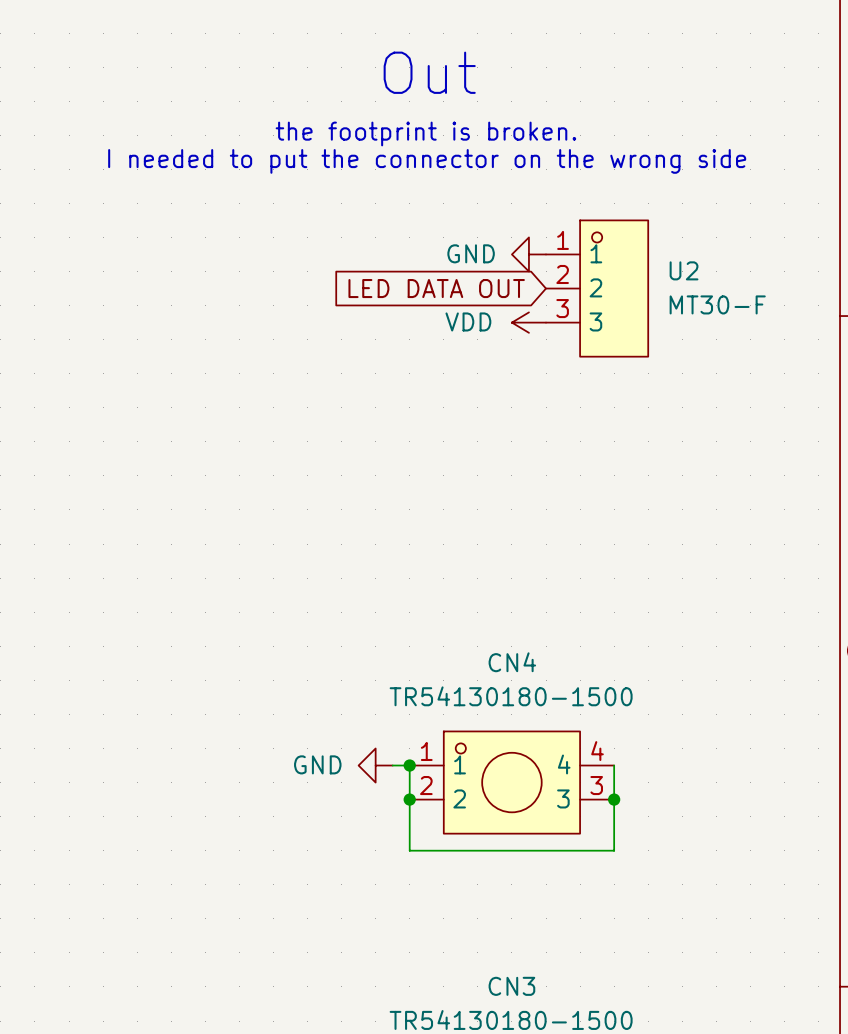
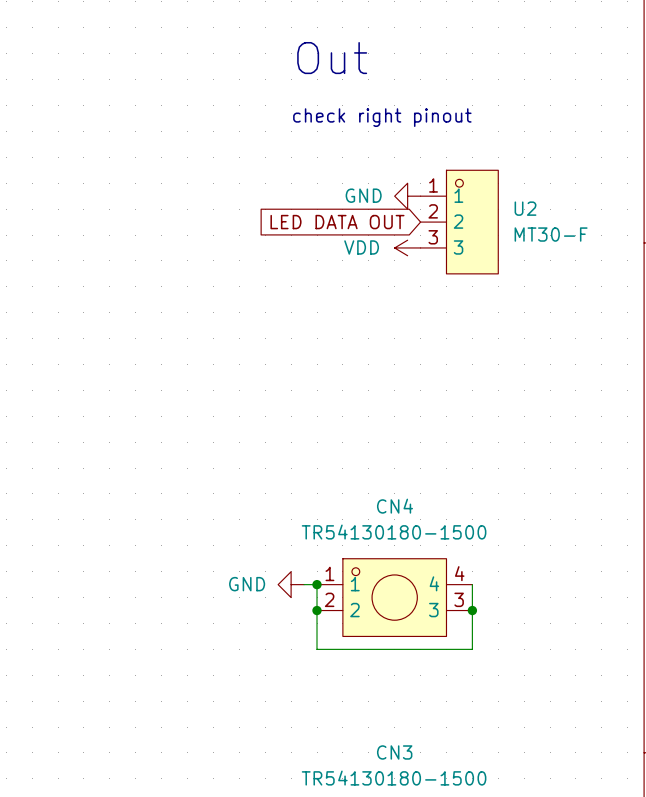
text: the footprint is broken. (425, 133) -> none
text: none -> check right pinout (382, 117)
text: I needed to put the connector on the wrong side (427, 161) -> none

